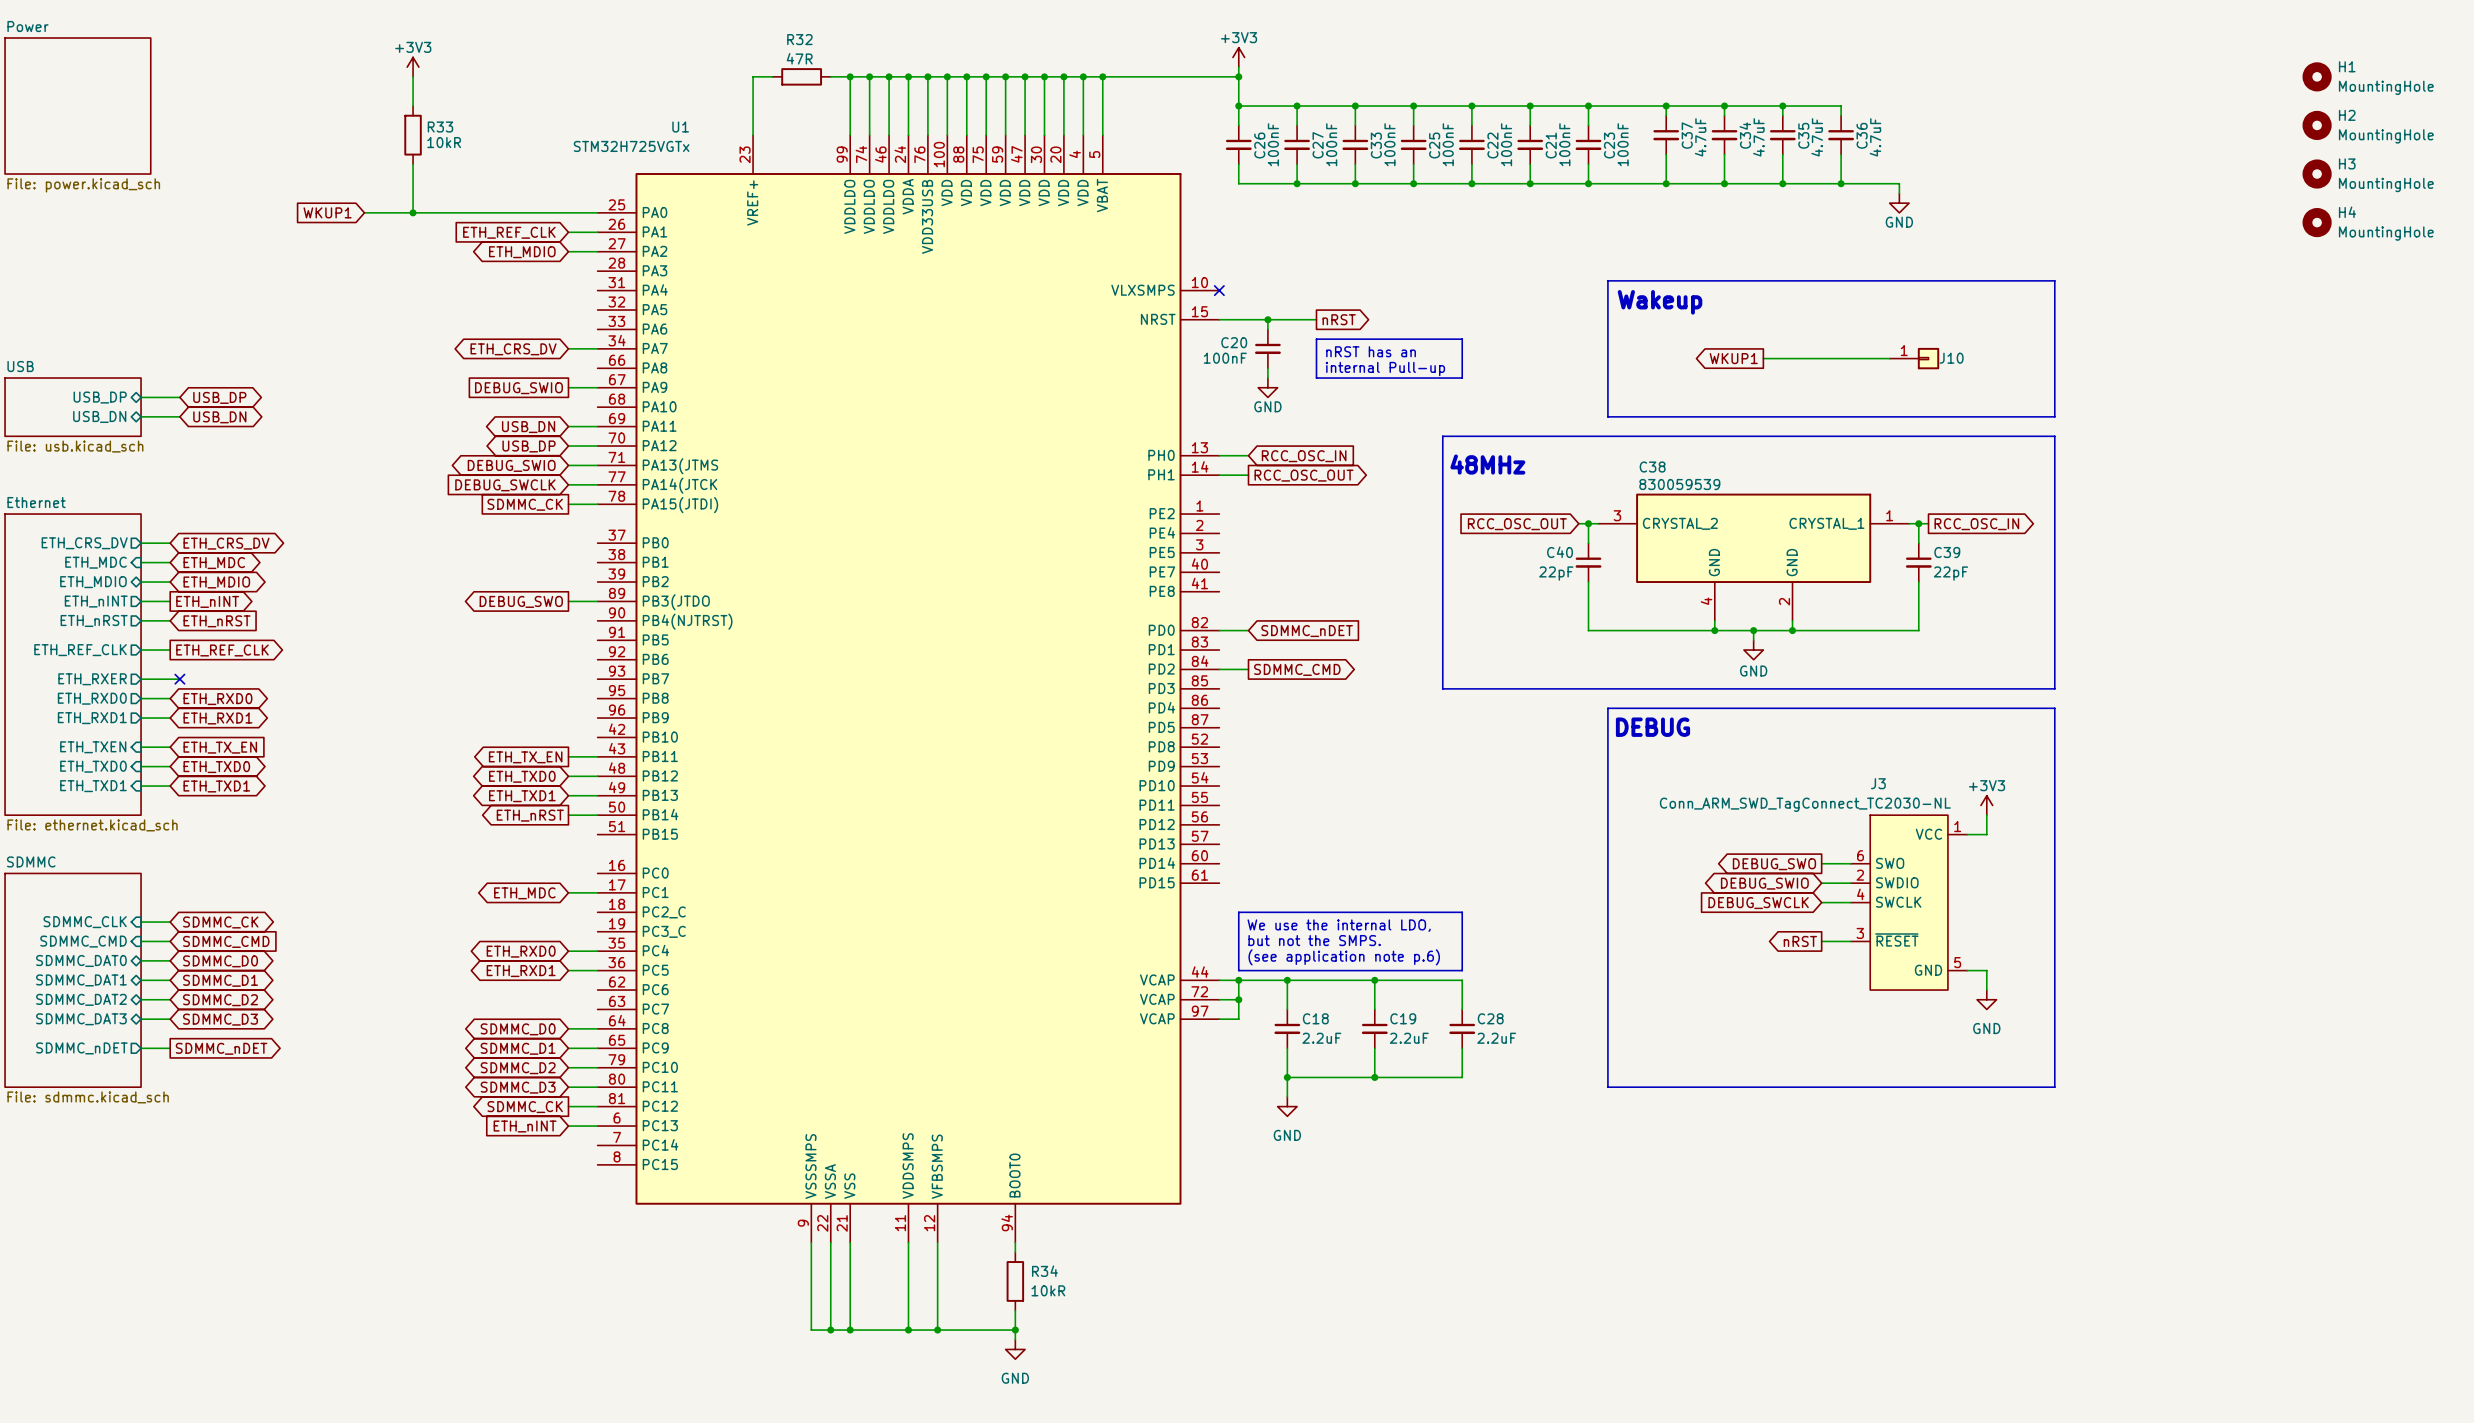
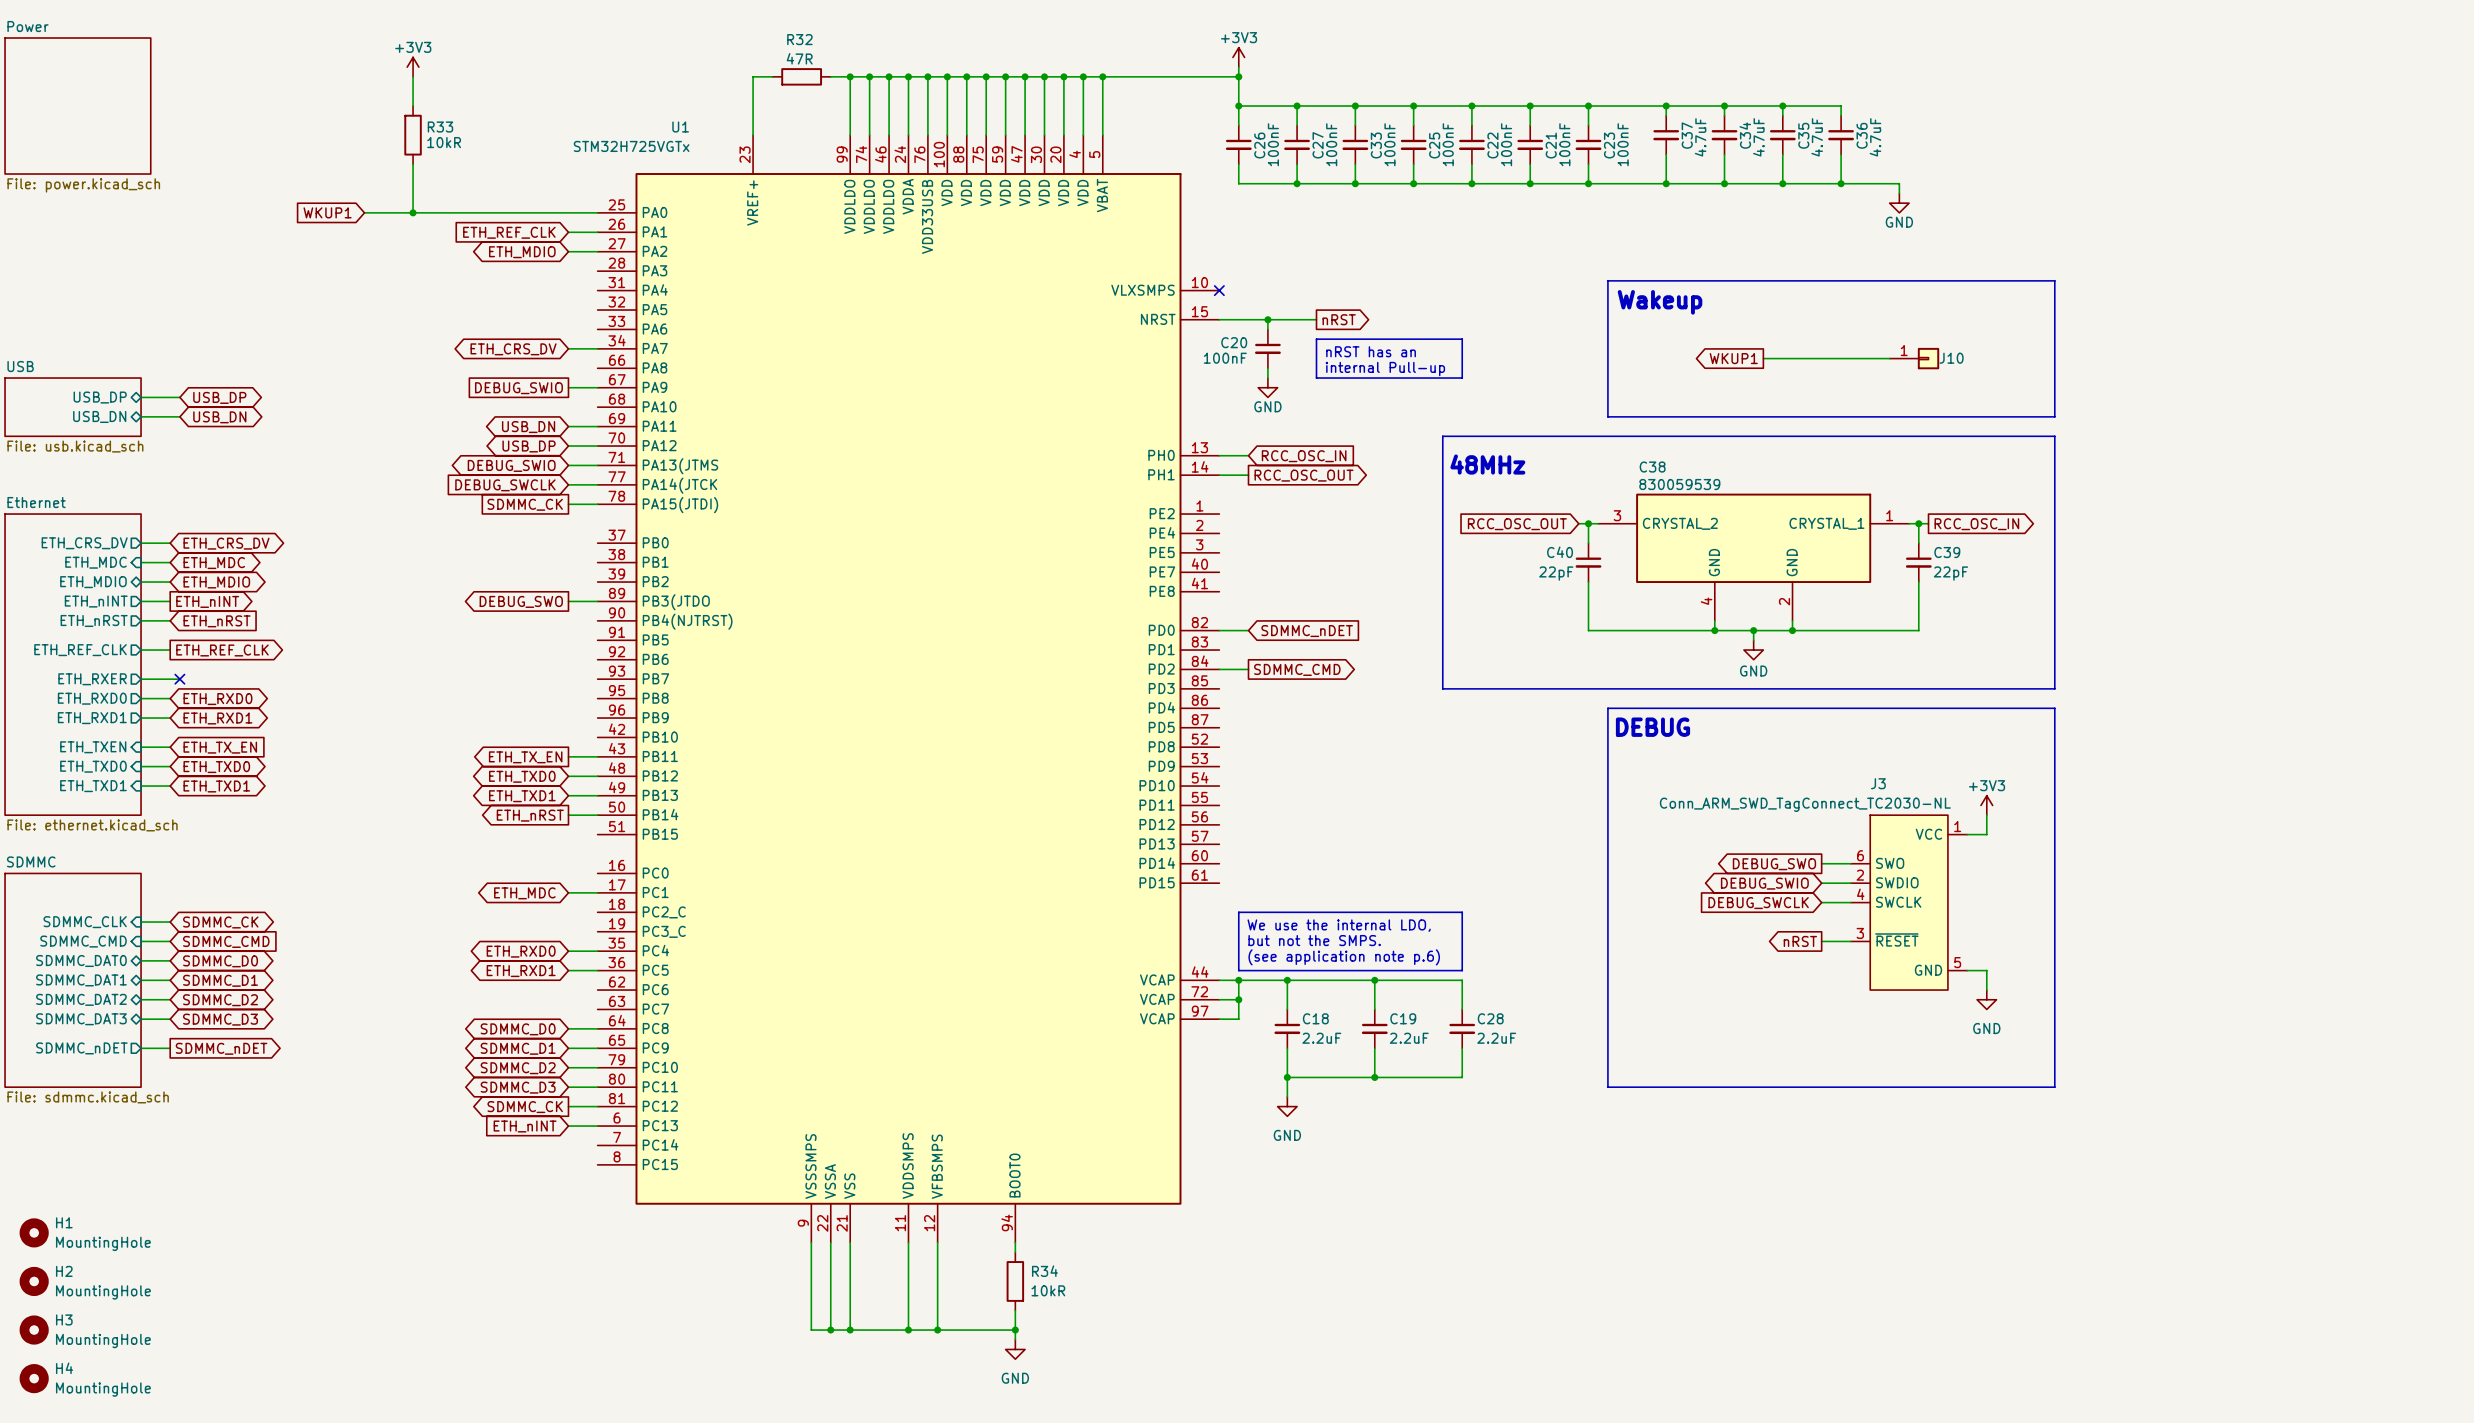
H1 position: (2317, 76) -> (34, 1232)
H2 position: (2317, 125) -> (34, 1281)
H3 position: (2317, 174) -> (34, 1330)
H4 position: (2317, 222) -> (34, 1378)

